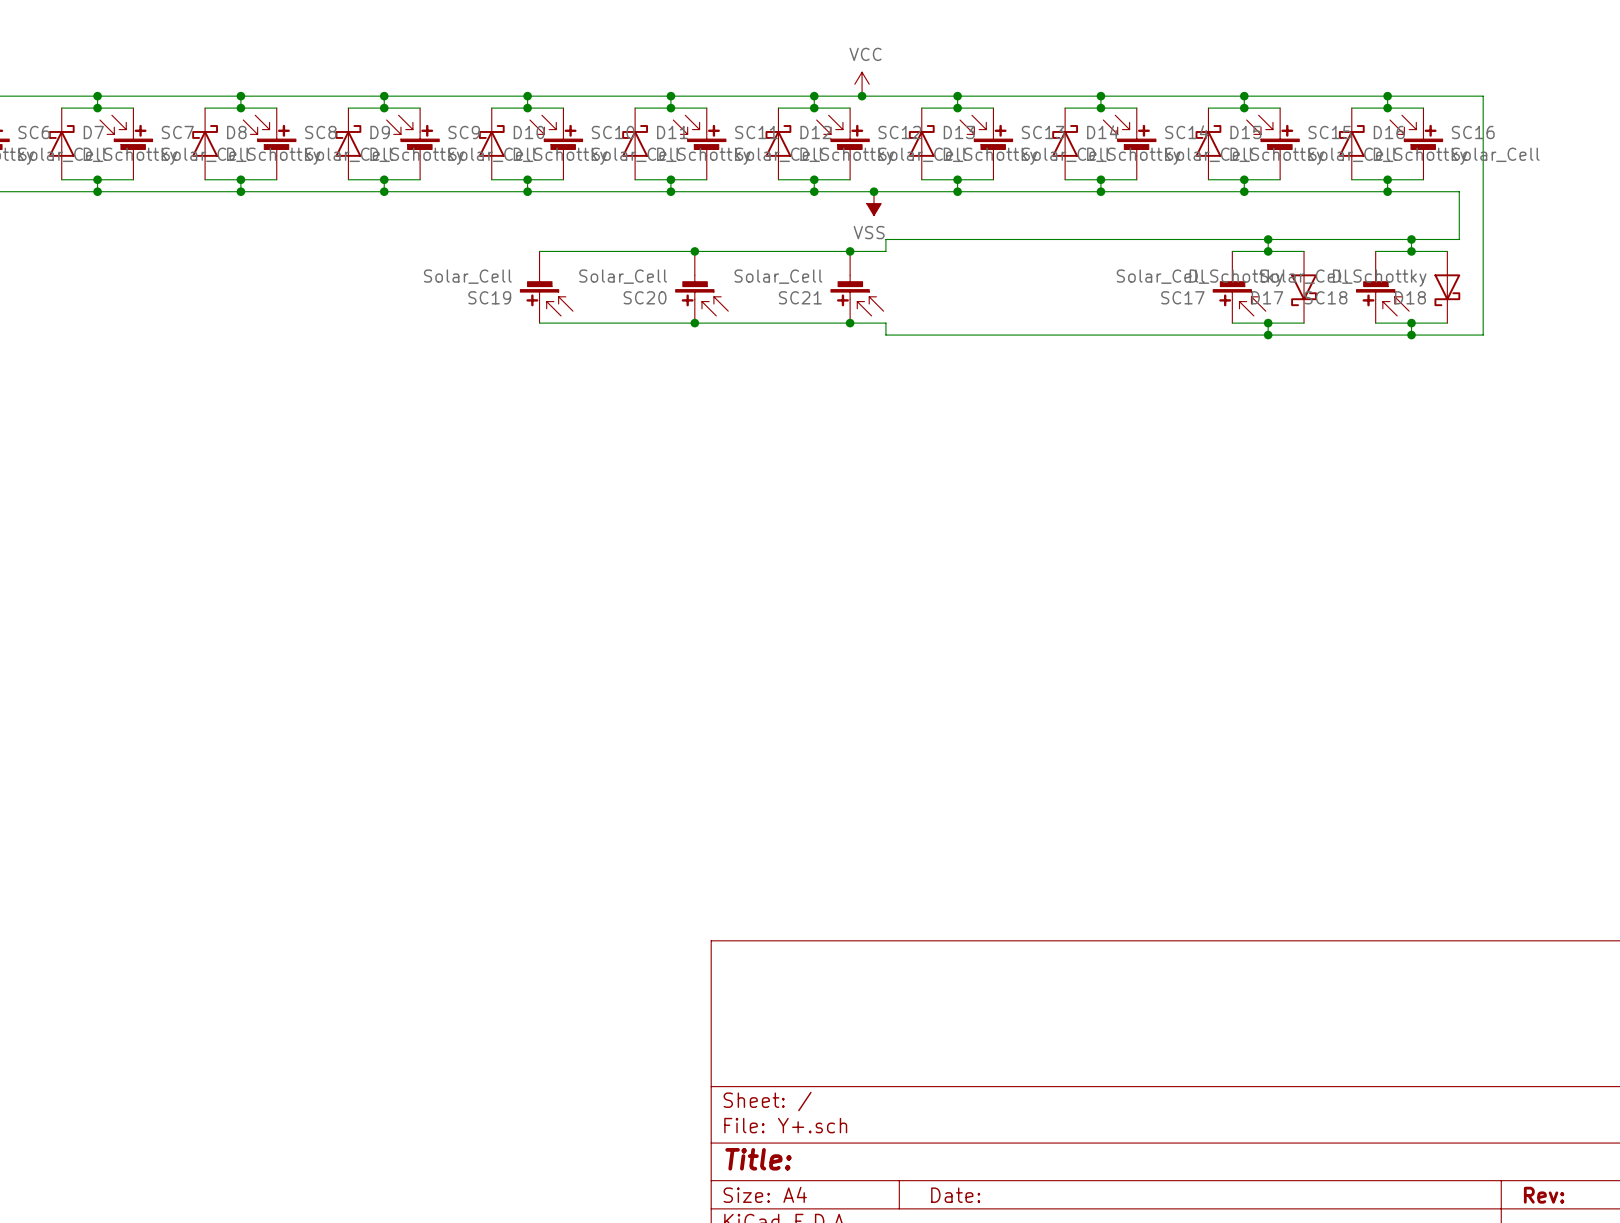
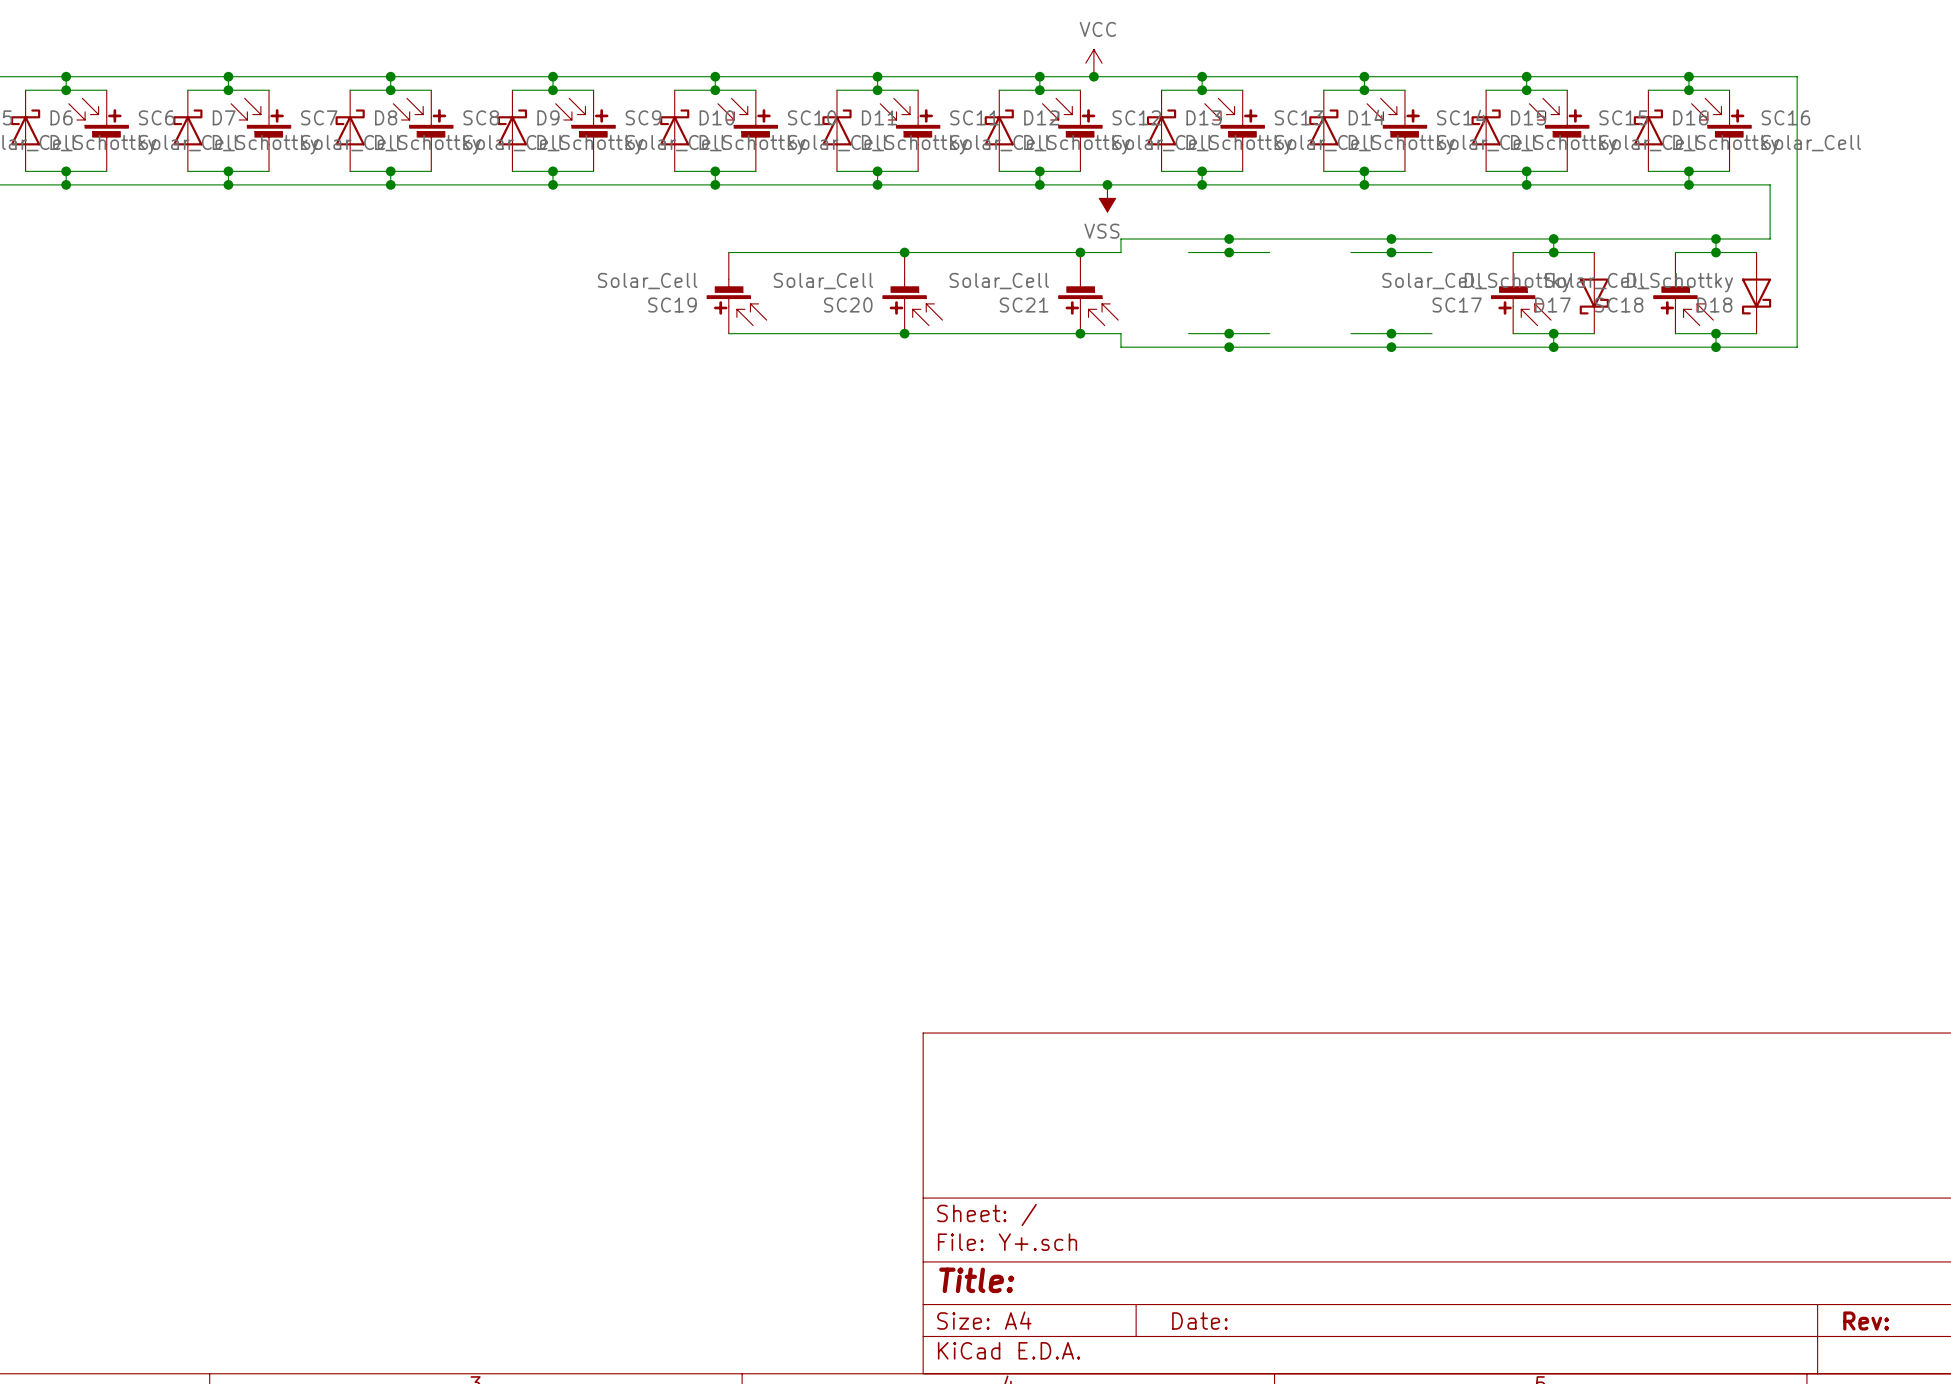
junction: none -> (1229, 239)
junction: none -> (1391, 239)
wire: none -> (1188, 252) (1269, 252)
junction: none -> (1229, 252)
wire: none -> (1350, 252) (1432, 252)
junction: none -> (1391, 252)
wire: none -> (1188, 333) (1269, 333)
junction: none -> (1229, 333)
wire: none -> (1350, 333) (1432, 333)
junction: none -> (1391, 333)
junction: none -> (1229, 347)
junction: none -> (1391, 347)

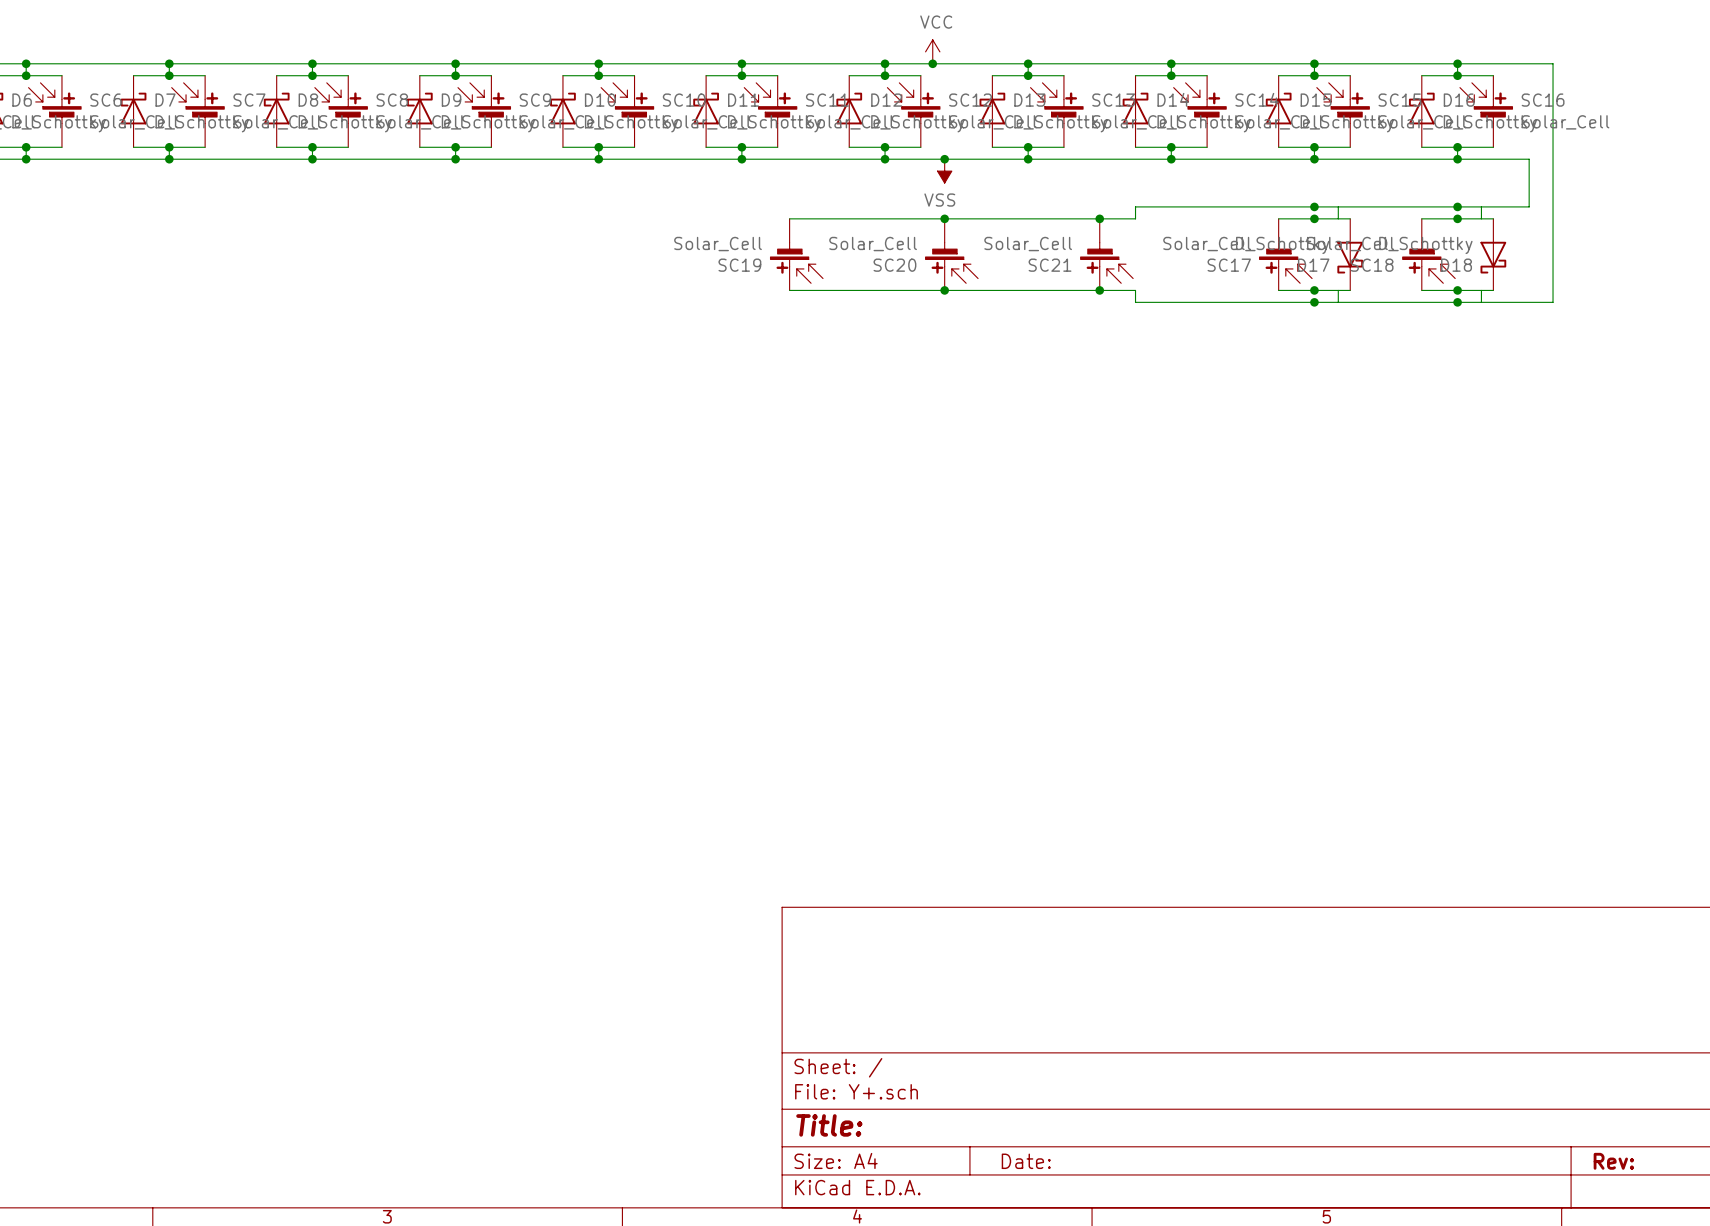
junction: (1229, 239) -> none
wire: (1323, 239) (1120, 239) (1120, 252) -> (1016, 218) (956, 218)
wire: none -> (1135, 206) (1135, 218) (1087, 218)
junction: (1391, 239) -> none
junction: none -> (1314, 206)
junction: (1553, 239) -> none
junction: none -> (1457, 206)
junction: (1716, 239) -> none
wire: (728, 252) (931, 252) -> none
junction: (904, 252) -> none
junction position: (1080, 252) -> (944, 218)
junction: (1229, 252) -> none
junction: none -> (1099, 218)
wire: (1350, 252) (1432, 252) -> none
junction: (1391, 252) -> none
junction: none -> (1314, 218)
junction: (1553, 252) -> none
wire: (1567, 252) (1594, 252) -> (1278, 218) (1302, 218)
junction: none -> (1457, 218)
junction: (1716, 252) -> none
wire: (1729, 252) (1756, 252) -> (1421, 218) (1445, 218)
SC19 position: (736, 293) -> (796, 254)
SC20 position: (912, 293) -> (951, 254)
SC21 position: (1088, 293) -> (1106, 254)
SC17 position: (1521, 293) -> (1285, 254)
D17 position: (1594, 293) -> (1350, 254)
SC18 position: (1683, 293) -> (1428, 254)
D18 position: (1756, 293) -> (1493, 254)
wire: (728, 333) (931, 333) -> none
junction: (904, 333) -> none
junction position: (1080, 333) -> (944, 290)
wire: (1120, 333) (1120, 347) (1323, 347) -> (956, 290) (1016, 290)
junction: (1229, 333) -> none
wire: none -> (1087, 290) (1135, 290) (1135, 302)
junction: none -> (1099, 290)
wire: (1350, 333) (1432, 333) -> none
junction: (1391, 333) -> none
junction: none -> (1314, 290)
junction: (1553, 333) -> none
wire: (1567, 333) (1594, 333) -> (1278, 290) (1302, 290)
junction: none -> (1457, 290)
junction: (1716, 333) -> none
wire: (1729, 333) (1756, 333) -> (1421, 290) (1445, 290)
junction: (1229, 347) -> none
junction: (1391, 347) -> none
junction: none -> (1314, 302)
junction: (1553, 347) -> none
junction: none -> (1457, 302)
junction: (1716, 347) -> none

